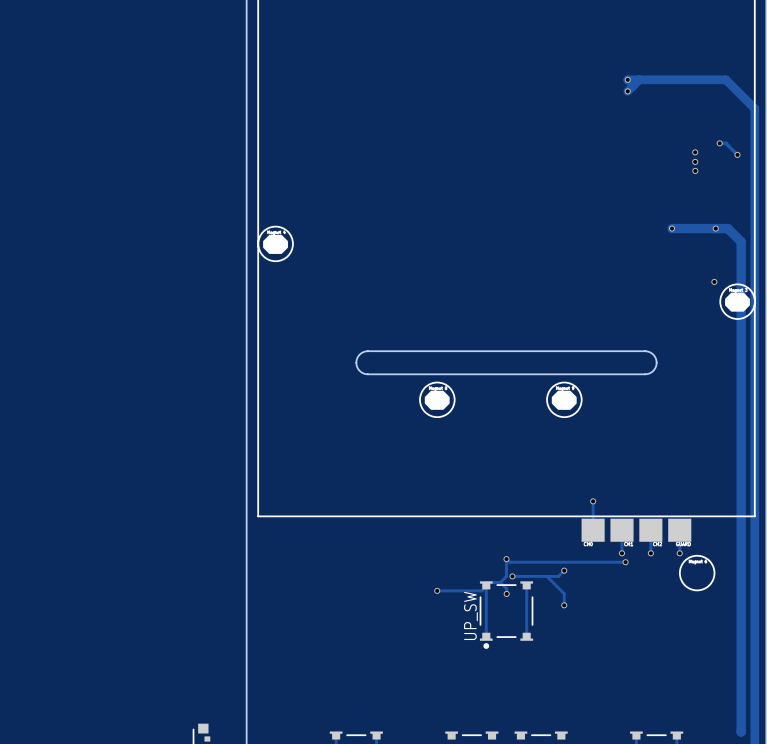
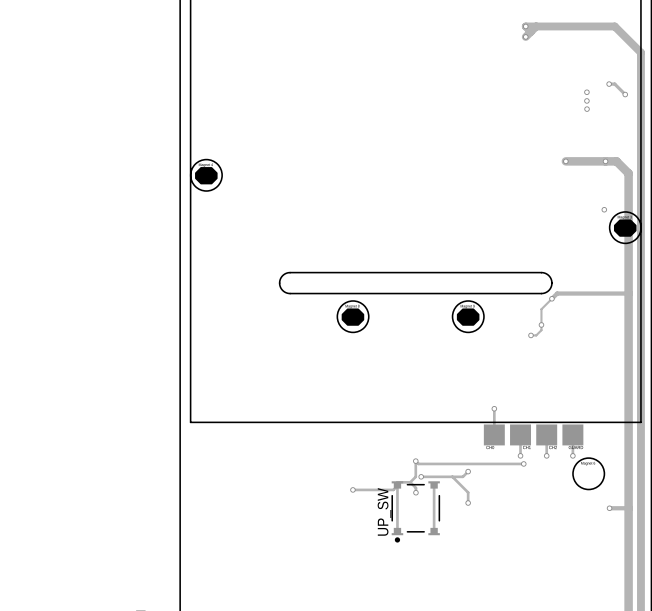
track: none -> (628, 293) (557, 293) (541, 309) (541, 330) (536, 335) (530, 335)
via: none -> (551, 298)
via: none -> (541, 324)
via: none -> (530, 335)
track: none -> (609, 508) (628, 508)
via: none -> (609, 508)

